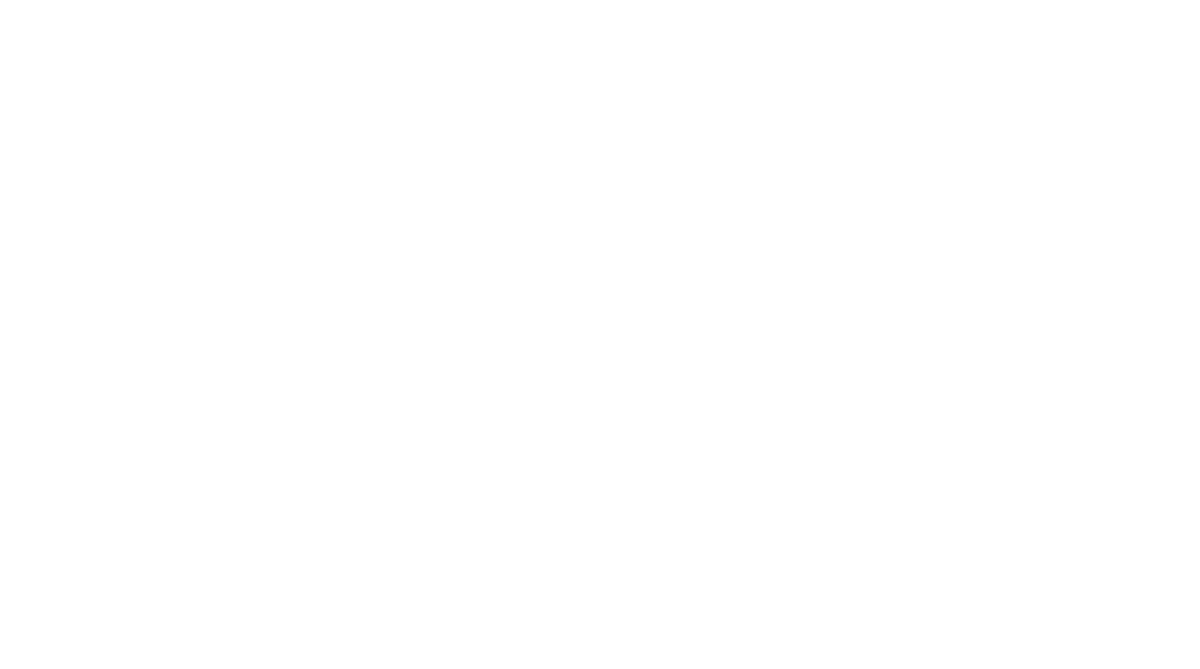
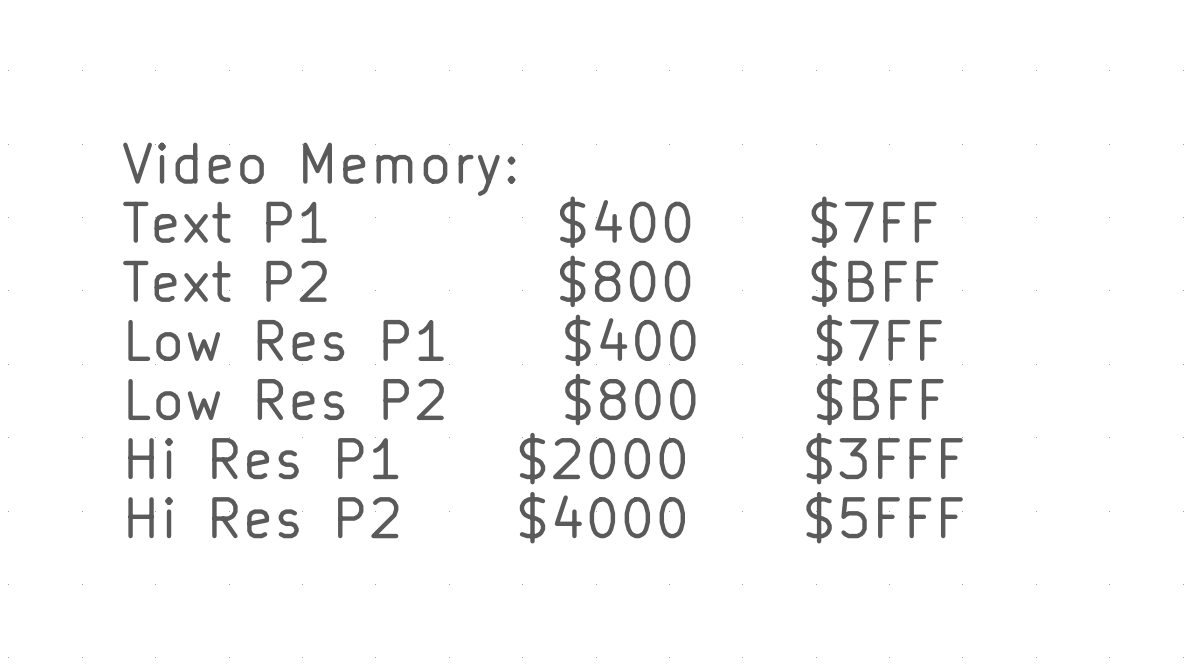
text: none -> Video Memory: (319, 169)
text: none -> Text P1 $400 $7FF (529, 222)
text: none -> Text P2 $800 $BFF (530, 281)
text: none -> Low Res P1 $400 $7FF (535, 340)
text: none -> Low Res P2 $800 $BFF (535, 399)
text: none -> Hi Res P1 $2000 $3FFF (545, 458)
text: none -> Hi Res P2 $4000 $5FFF (545, 517)

